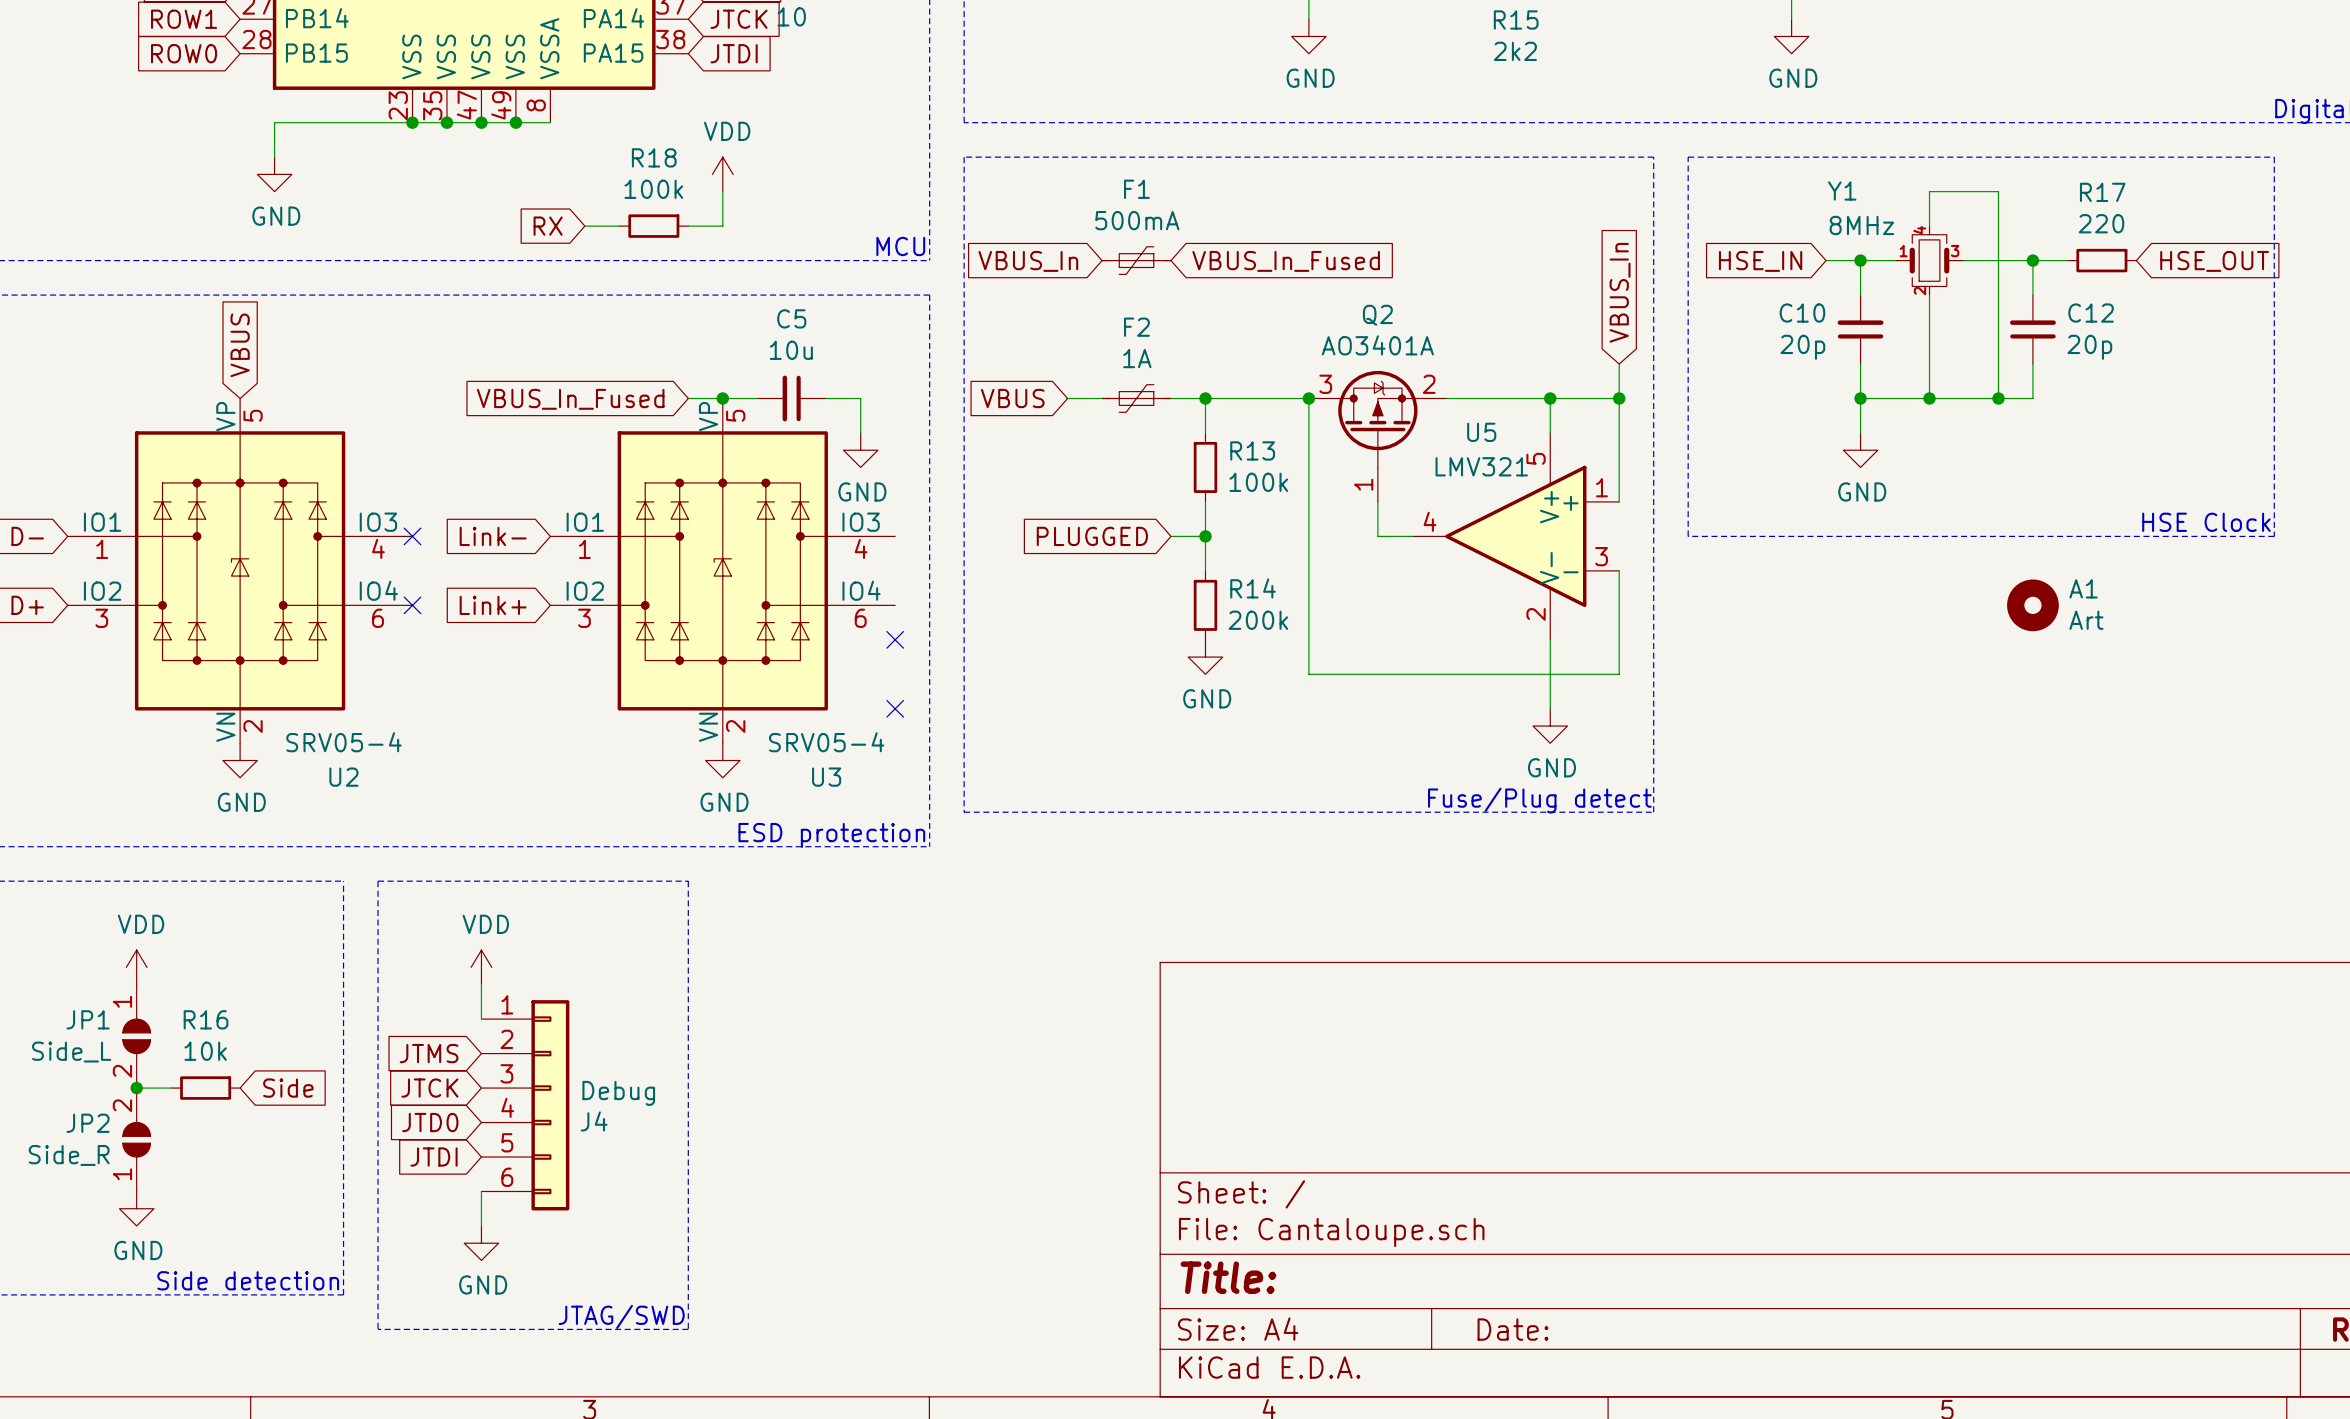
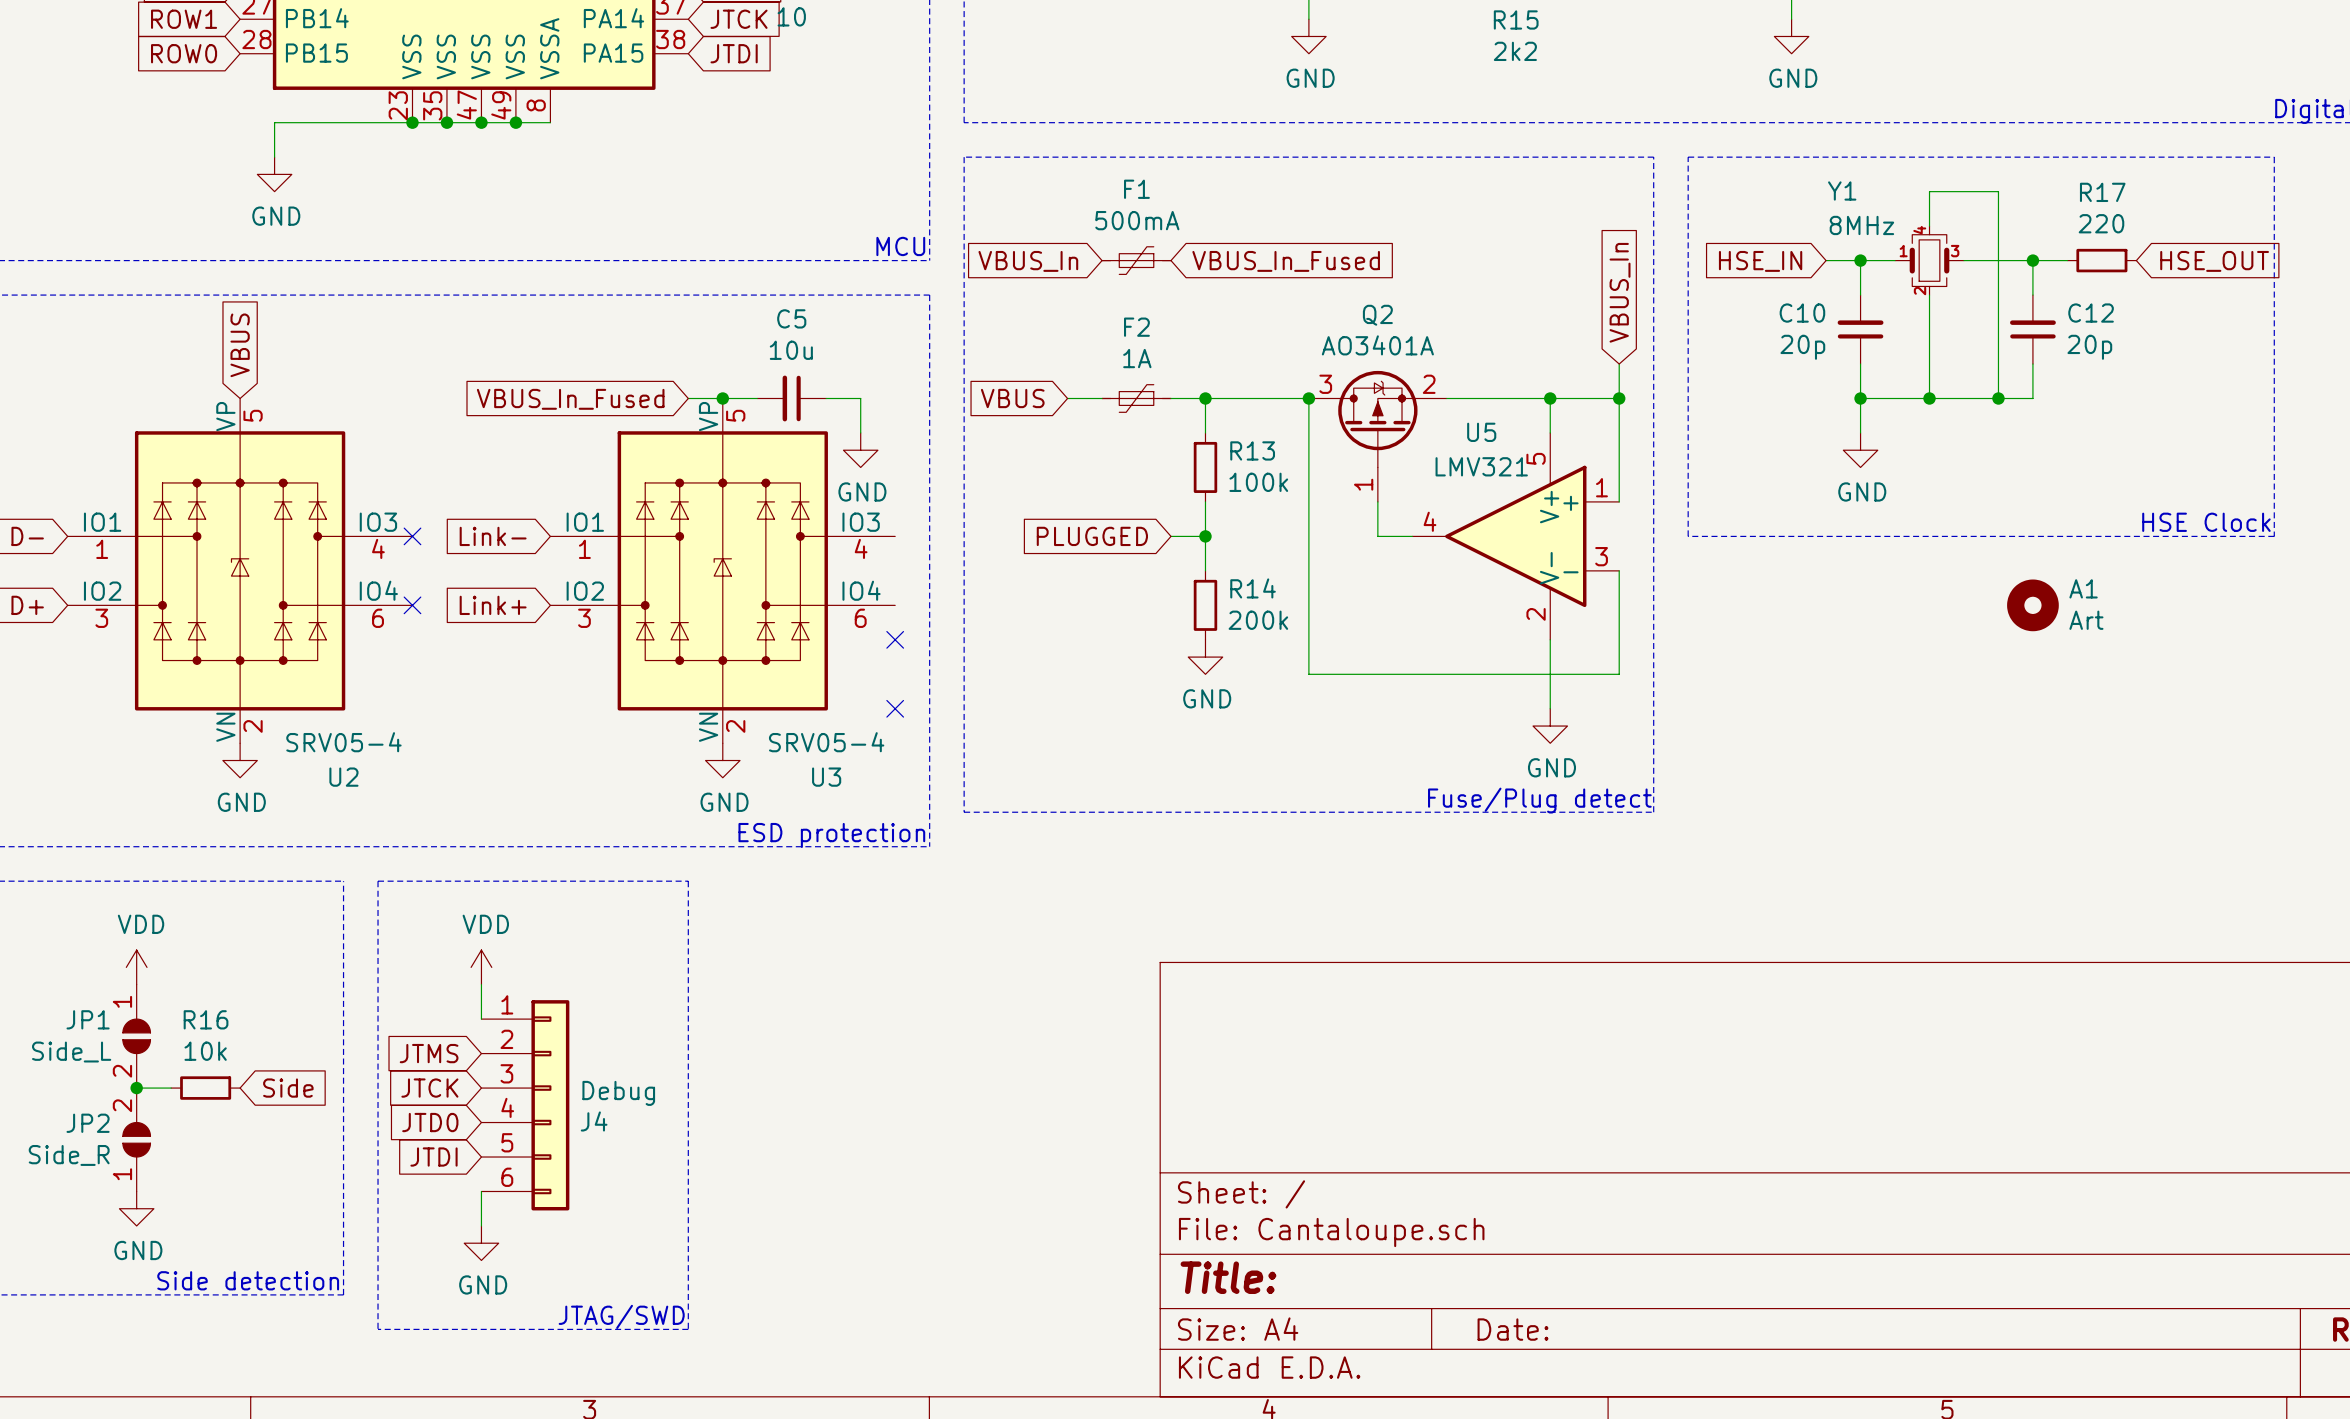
power symbol: VDD (722, 174) -> none
wire: (722, 191) (722, 226) (688, 226) -> none
global label: RX (548, 226) -> none
wire: (584, 226) (619, 226) -> none
R18: 100k (653, 226) -> none

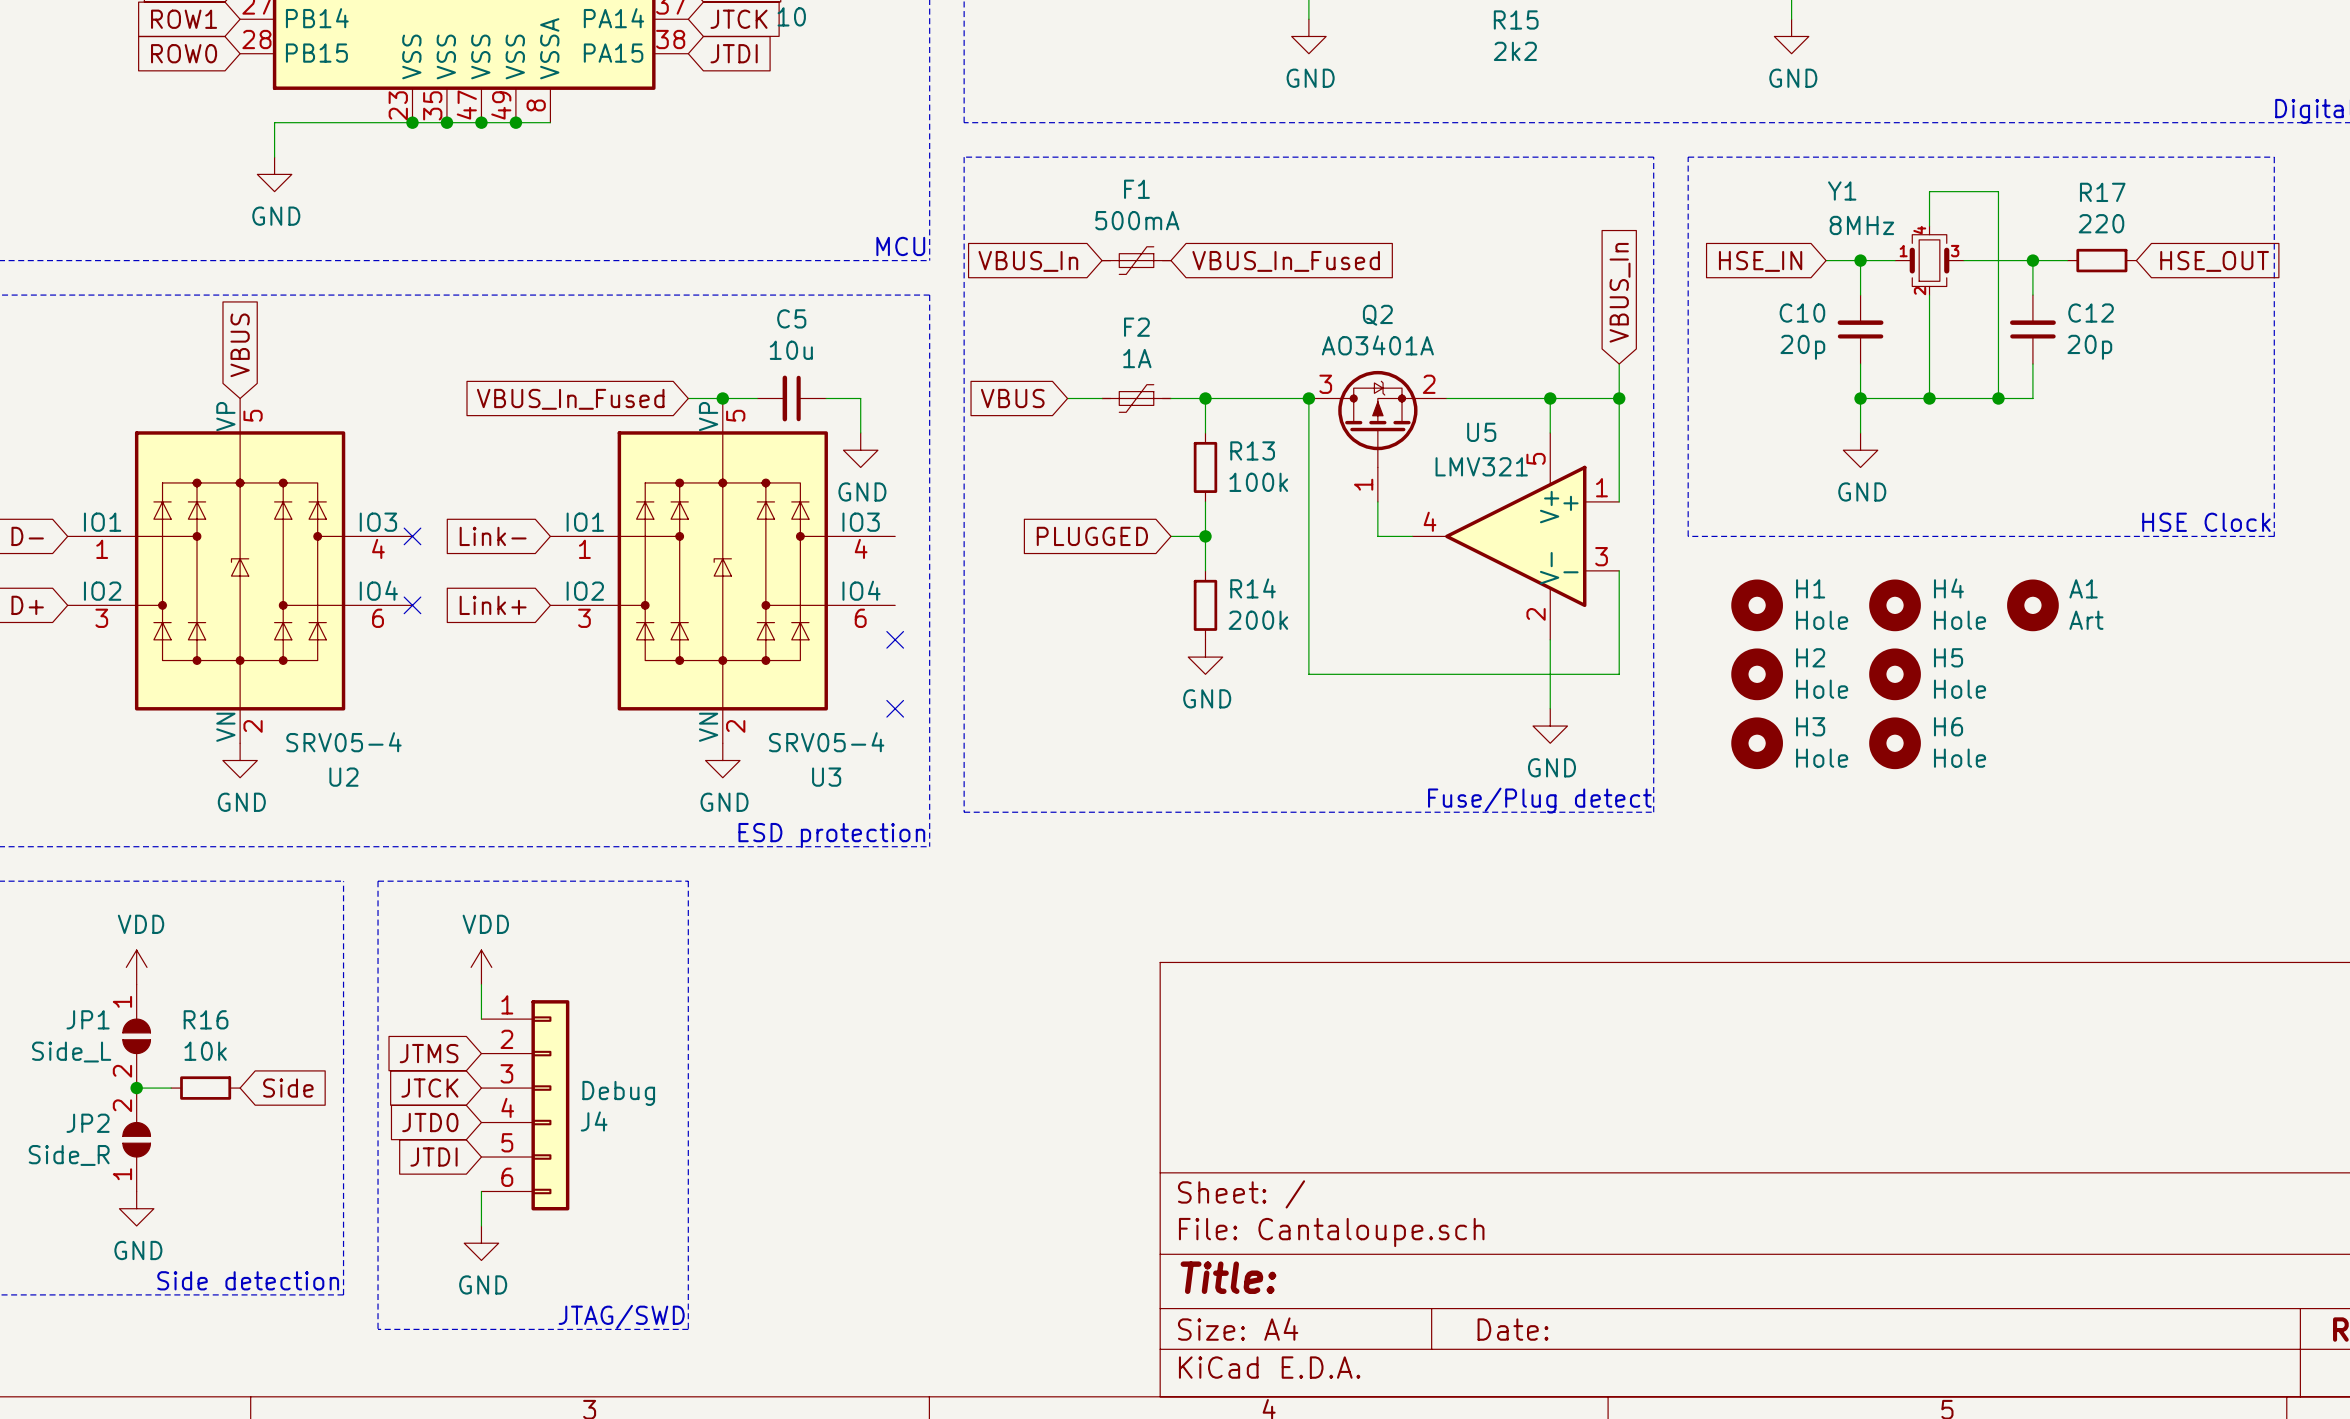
H1: none -> Hole (1757, 605)
H4: none -> Hole (1895, 605)
H2: none -> Hole (1757, 674)
H5: none -> Hole (1895, 674)
H3: none -> Hole (1757, 743)
H6: none -> Hole (1895, 743)

